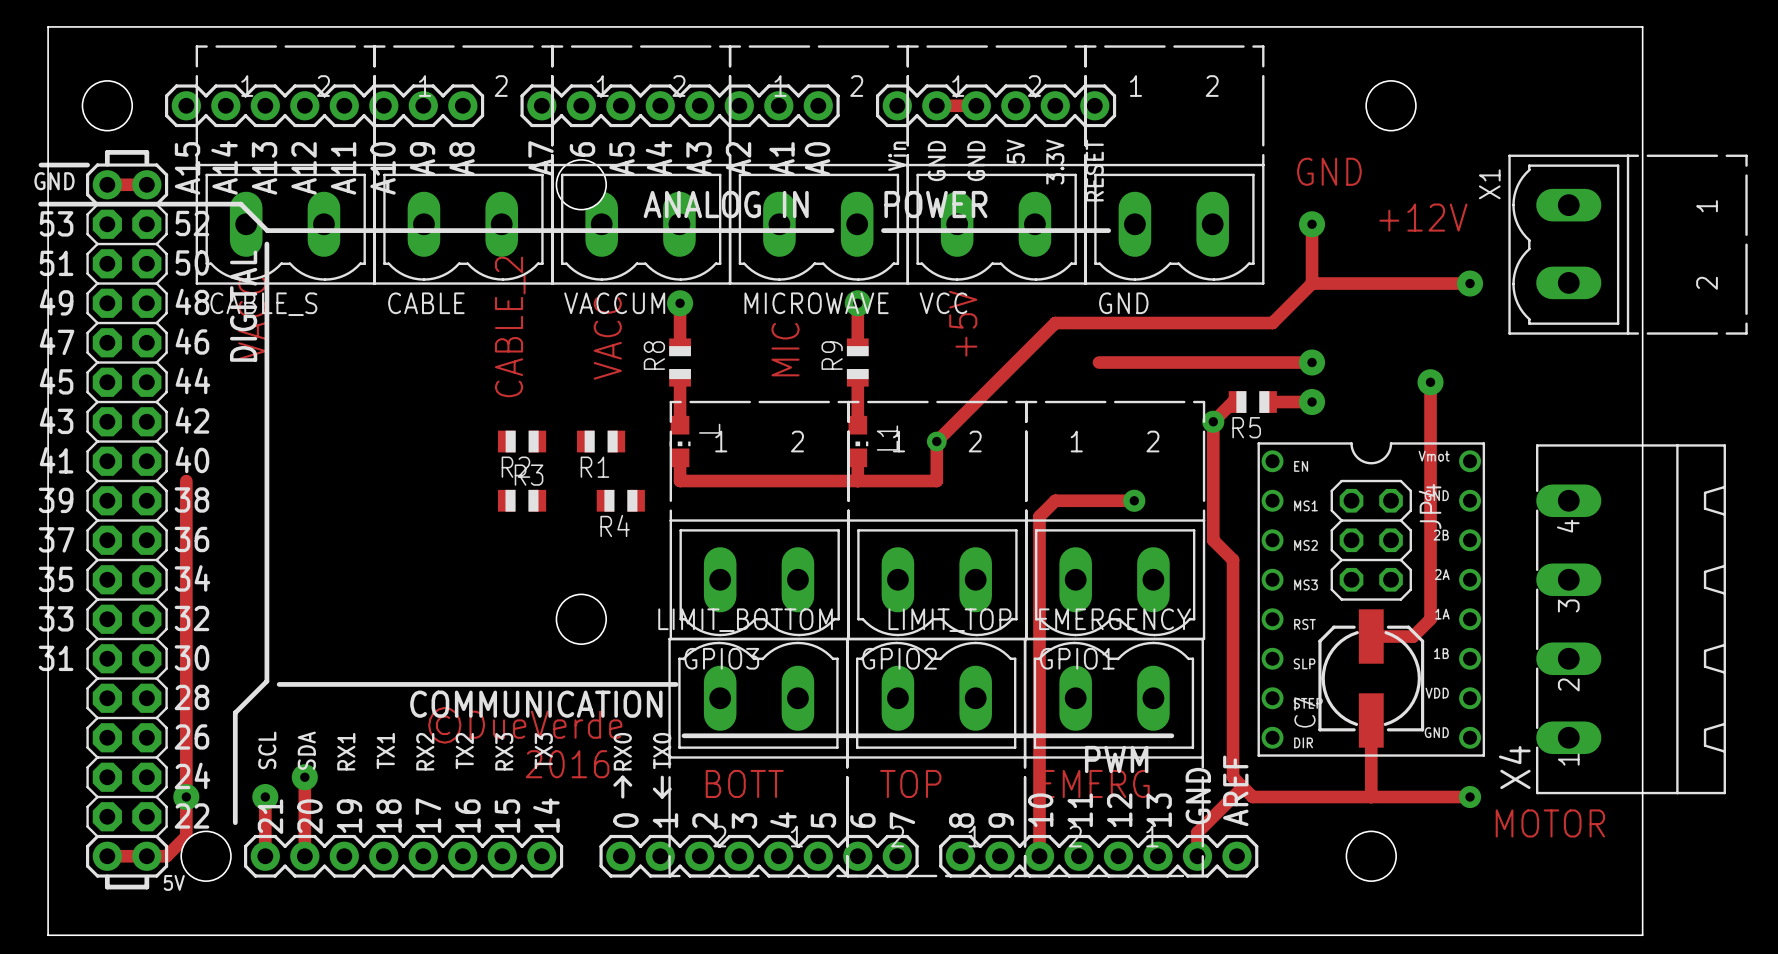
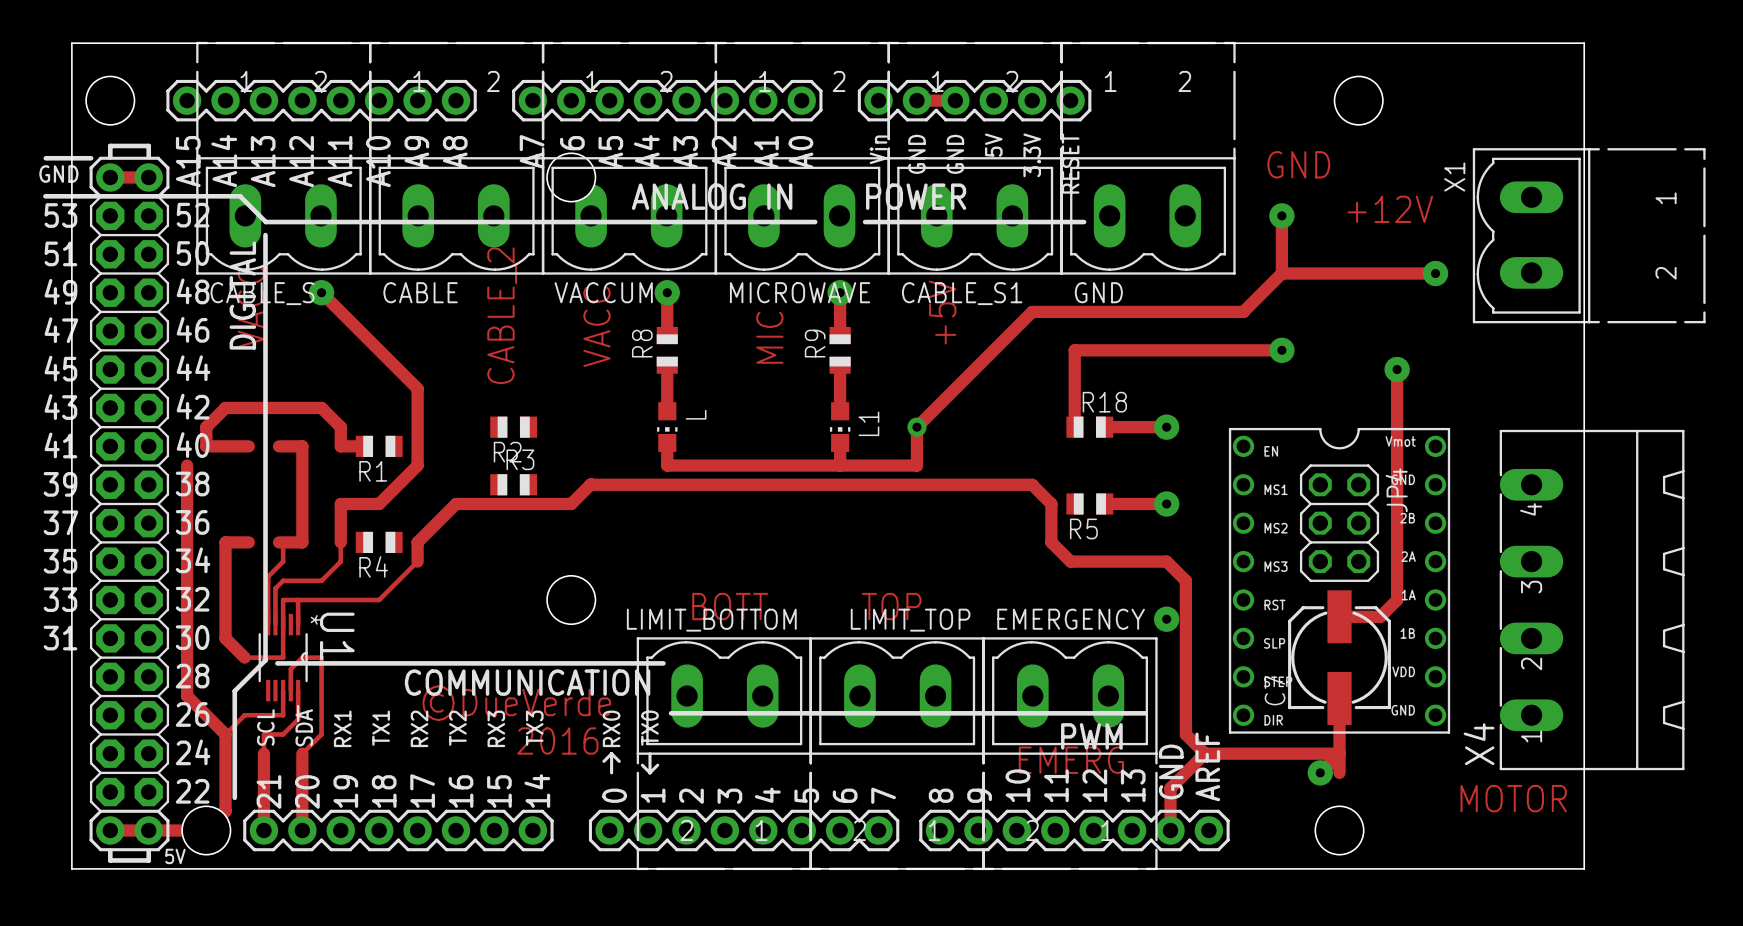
board edge: (48, 26) (1642, 26) (1642, 935) (48, 935) (48, 26) -> (71, 43) (71, 868) (1584, 868) (1584, 43) (71, 43)
track: none -> (321, 292) (417, 388) (417, 465) (379, 503) (340, 503) (340, 561) (321, 580) (283, 580) (275, 588) (275, 624)
via: none -> (321, 292)
VCC name: VCC (943, 303) -> CABLE_S1 (962, 293)
track: none -> (1074, 350) (1074, 427)
track: (1237, 402) (1233, 402) (1213, 421) (1213, 540) (1233, 560) (1233, 777) (1252, 797) (1470, 797) -> none
R5 position: (1252, 402) -> (1089, 503)
track: (1268, 402) (1312, 402) -> none
via: (1312, 402) -> none
via: (1213, 421) -> none
R1 position: (601, 441) -> (379, 446)
R18: none -> (1089, 427)
track: none -> (1104, 427) (1166, 427)
via: none -> (1166, 427)
track: none -> (248, 446) (206, 446) (206, 427) (225, 407) (321, 407) (340, 427) (340, 446) (364, 446)
track: none -> (279, 446) (302, 446) (302, 542) (279, 542) (283, 546) (283, 561) (268, 576) (268, 624)
track: none -> (591, 484) (571, 503) (456, 503) (417, 542) (417, 561) (379, 600) (283, 600) (283, 657) (244, 657) (225, 638) (225, 542) (248, 542)
track: none -> (590, 484) (1032, 484) (1051, 503) (1051, 542) (1070, 561) (1166, 561) (1185, 580) (1185, 734) (1205, 753)
R4 position: (620, 500) -> (379, 542)
track: (1134, 500) (1055, 500) (1039, 516) (1039, 856) -> none
via: (1134, 500) -> none
GPIO3: (759, 520) -> none
GPIO2: (937, 520) -> none
GPIO1: (1115, 520) -> none
track: none -> (1104, 503) (1166, 503)
via: none -> (1166, 503)
track: none -> (298, 600) (298, 624)
via: none -> (1166, 619)
U1: none -> (283, 668)
track: none -> (283, 690) (283, 715) (244, 715) (225, 734)
track: none -> (290, 690) (290, 669) (302, 657) (321, 657) (321, 734) (302, 753)
track: none -> (298, 690) (298, 719) (283, 734) (263, 734) (263, 772)
track: (186, 718) (186, 836) (166, 856) -> (225, 734) (225, 811) (206, 830) (167, 830)
track: none -> (187, 696) (225, 734)
LIMIT_BOTTOM position: (758, 757) -> (724, 753)
LIMIT_TOP position: (936, 757) -> (897, 753)
EMERGENCY position: (1113, 757) -> (1070, 753)
via: (304, 777) -> none
track: none -> (1205, 753) (1339, 753) (1320, 772)
text position: BOTT (744, 783) -> BOTT (730, 606)
text position: TOP (910, 783) -> TOP (891, 606)
track: (1242, 787) (1197, 832) -> (1205, 753) (1170, 788) (1170, 807)
via: (186, 797) -> none
via: (265, 797) -> none
via: none -> (1320, 772)
via: (1470, 797) -> none

